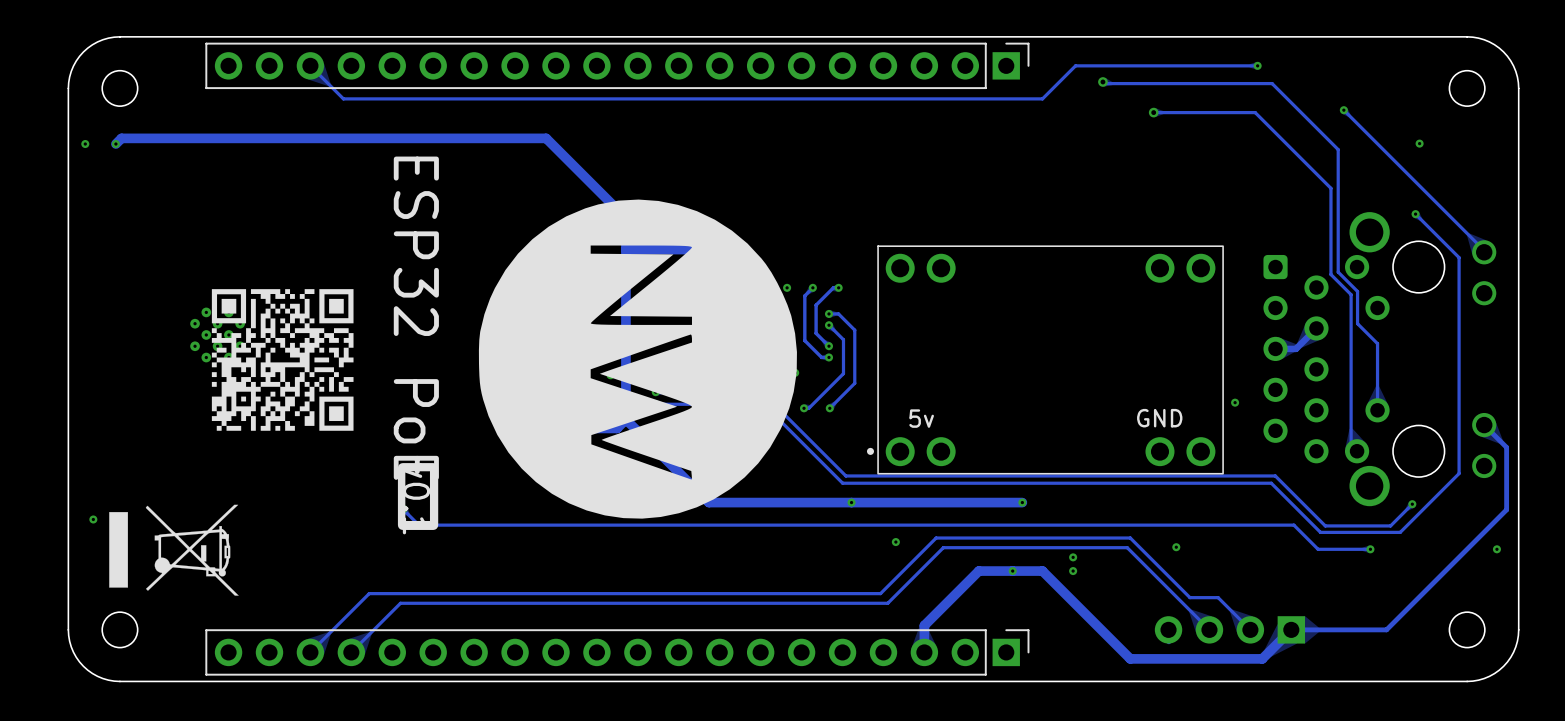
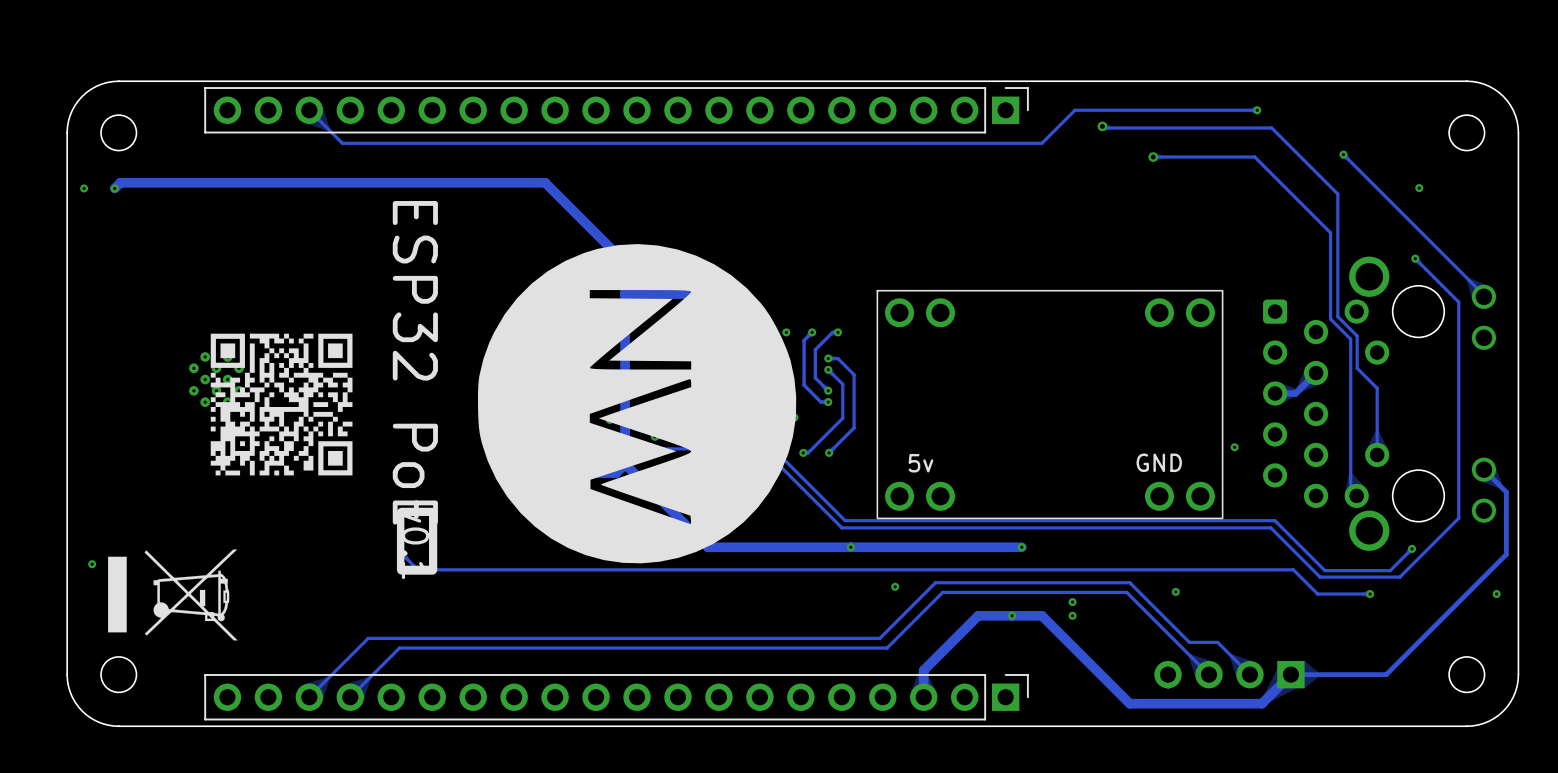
drawing: [866, 447, 874, 455] -> none

